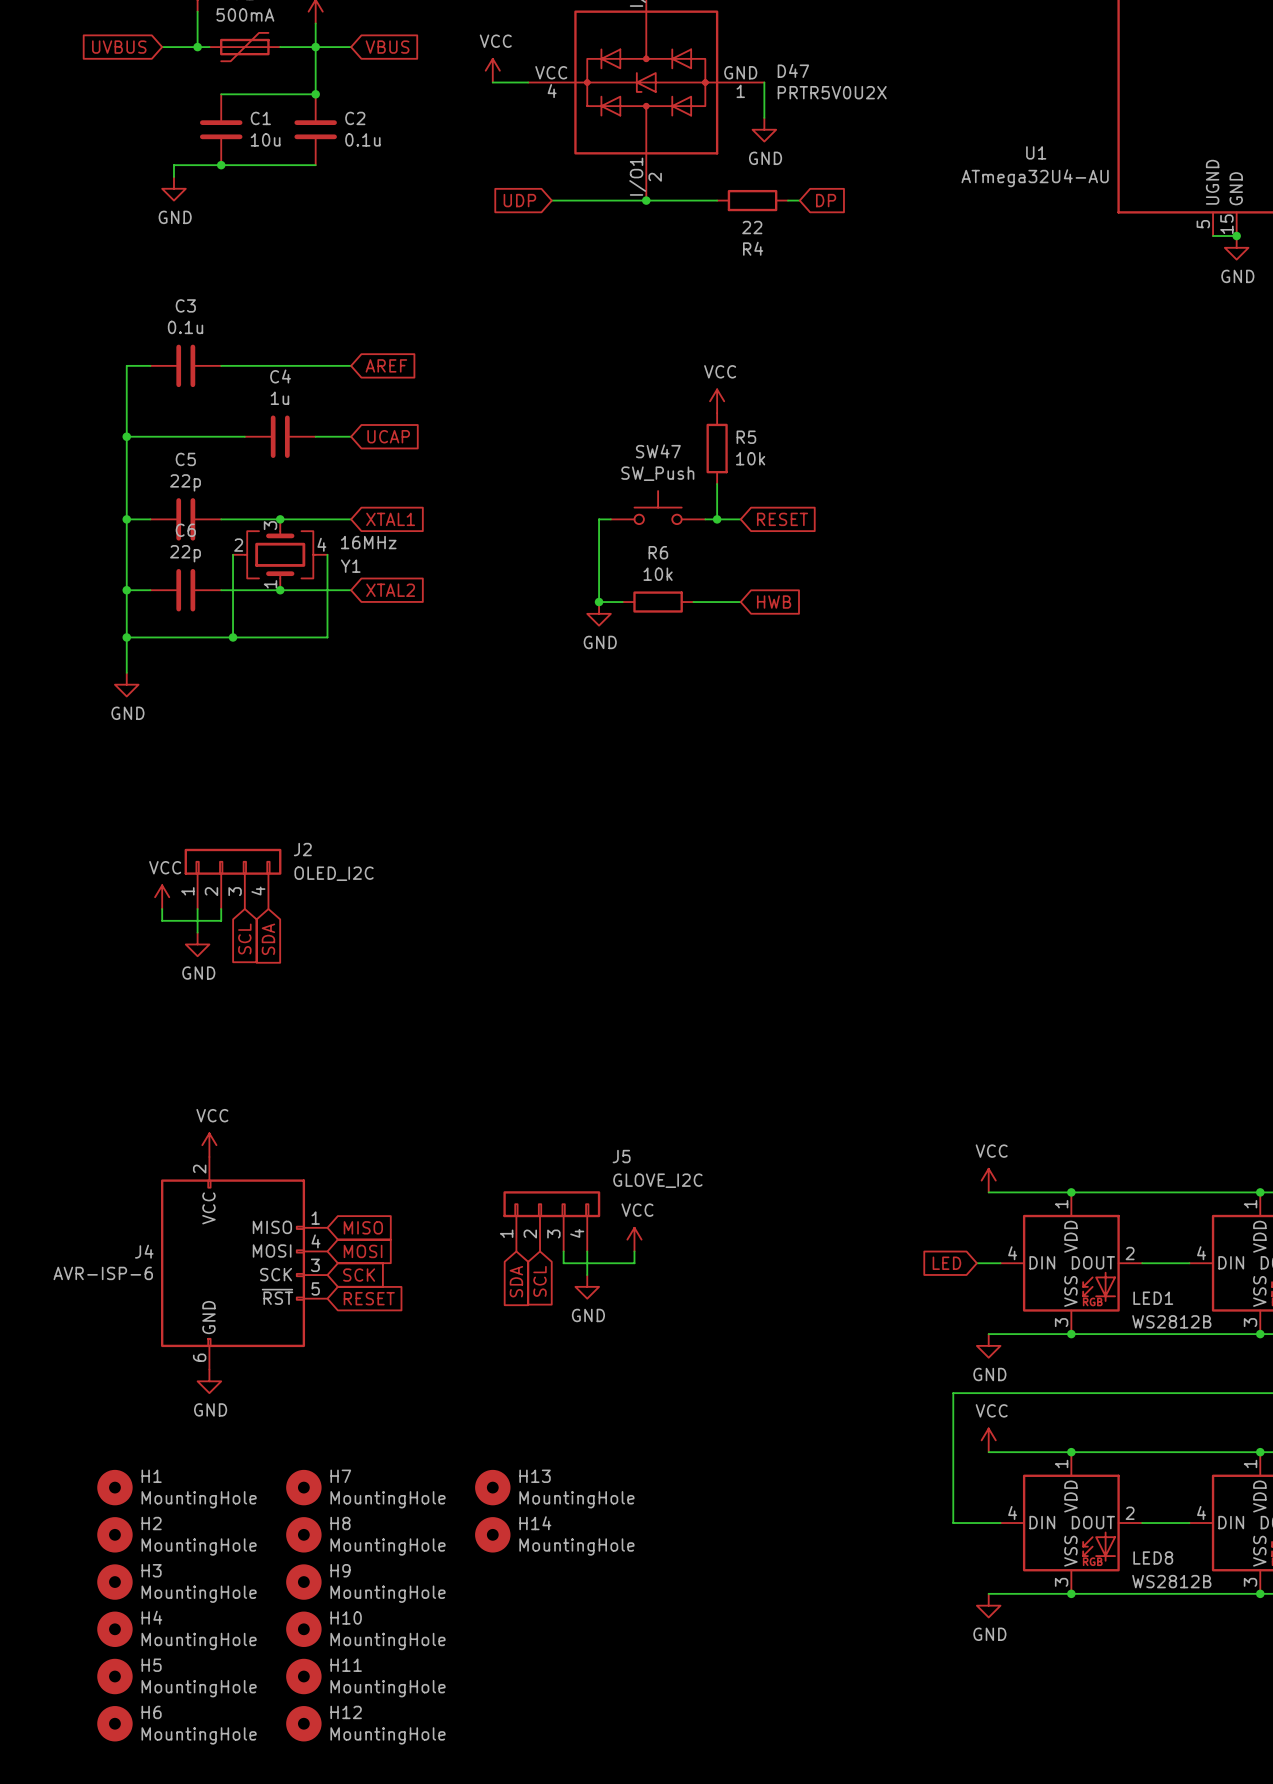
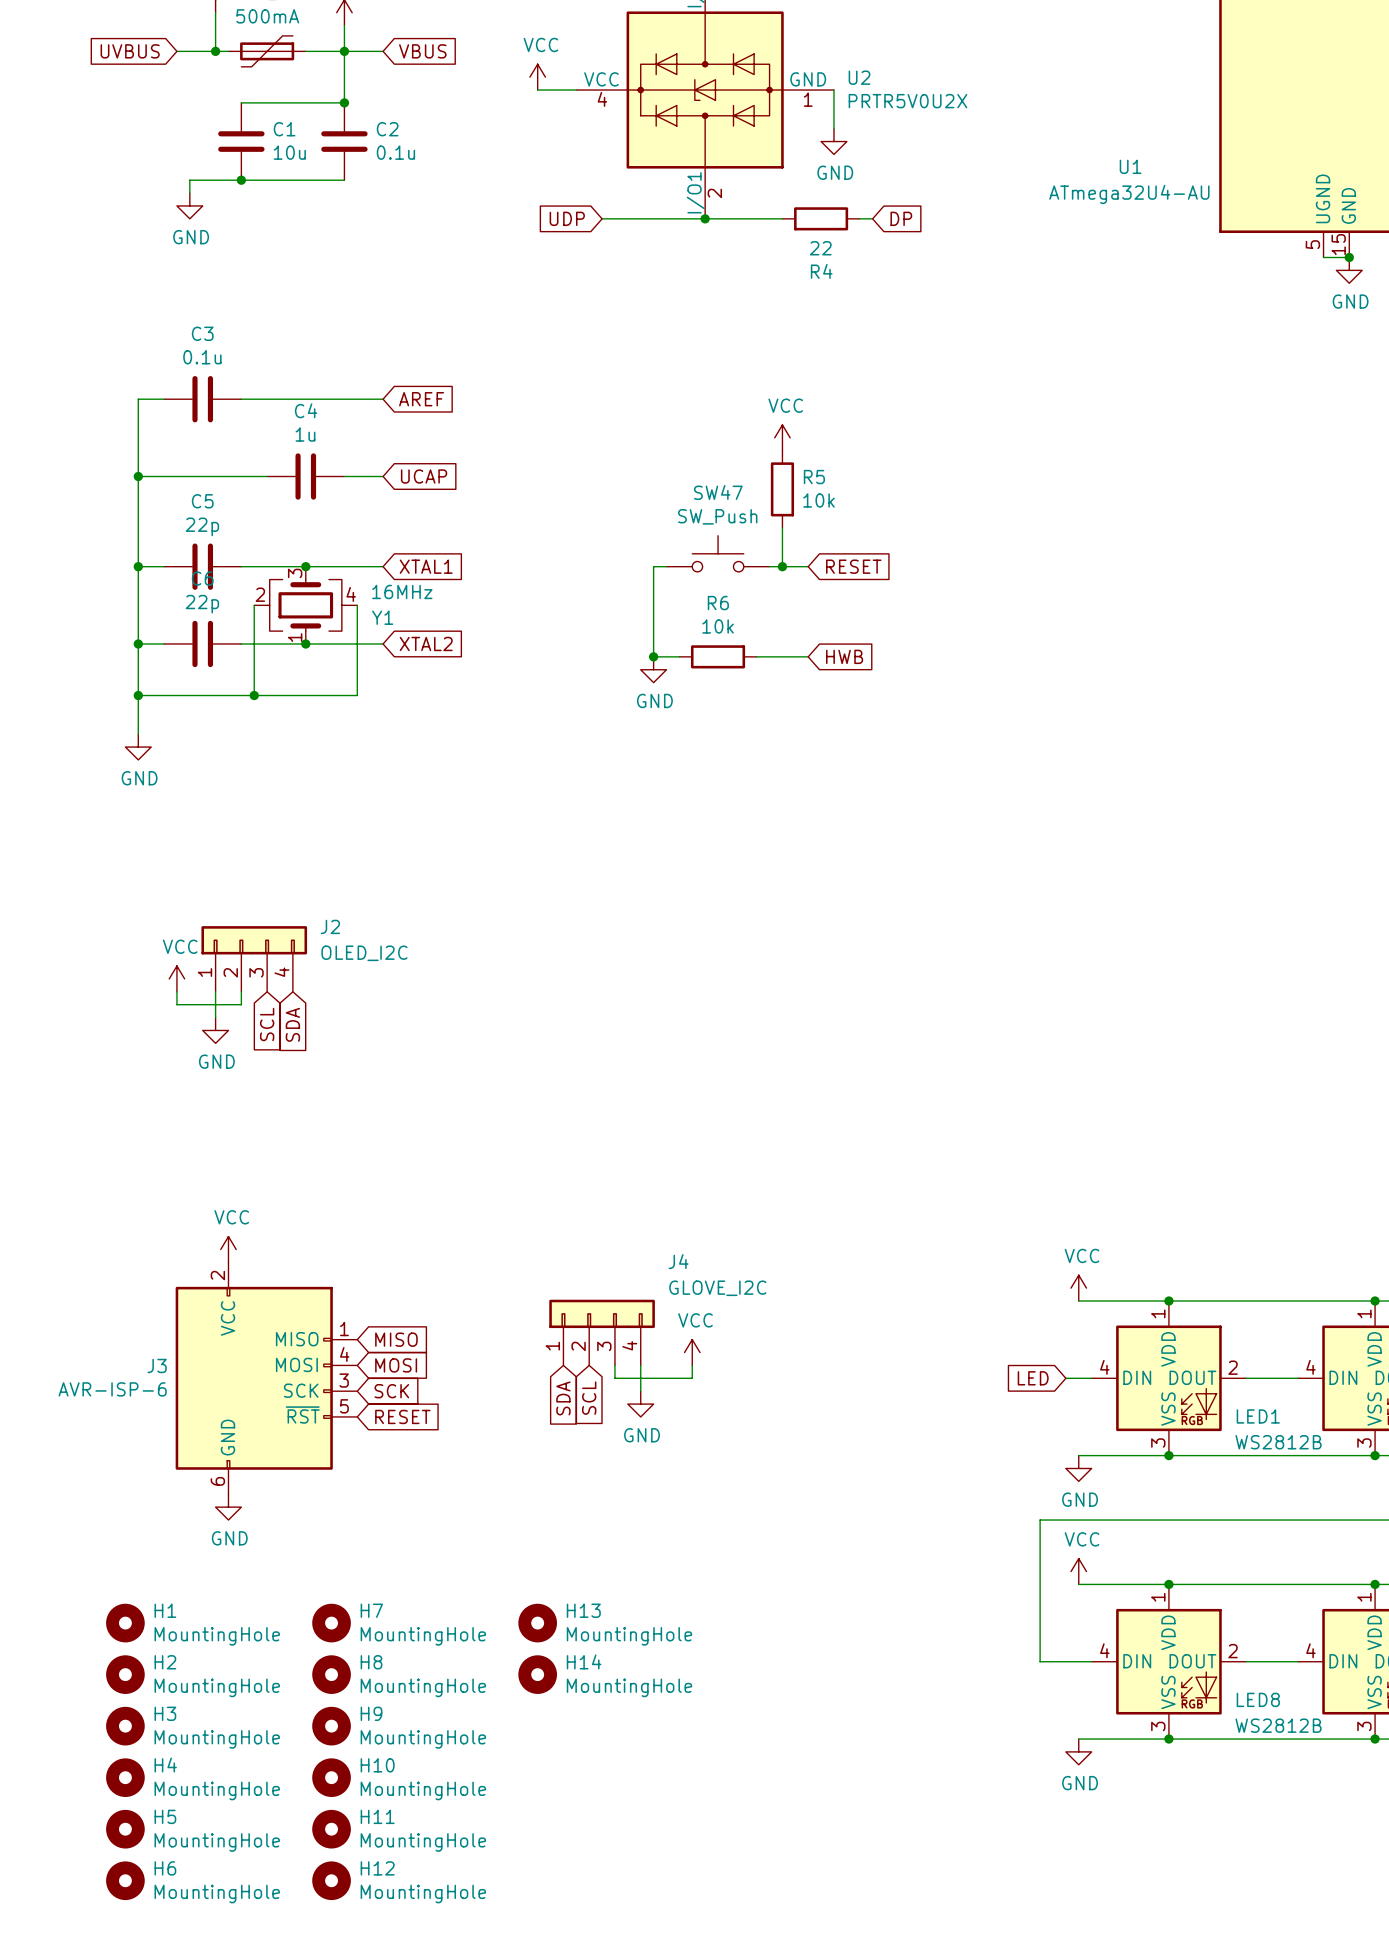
D47 name: D47 (793, 70) -> U2 (859, 77)
J5 name: J5 (621, 1156) -> J4 (678, 1261)
J4 name: J4 (144, 1251) -> J3 (157, 1365)

